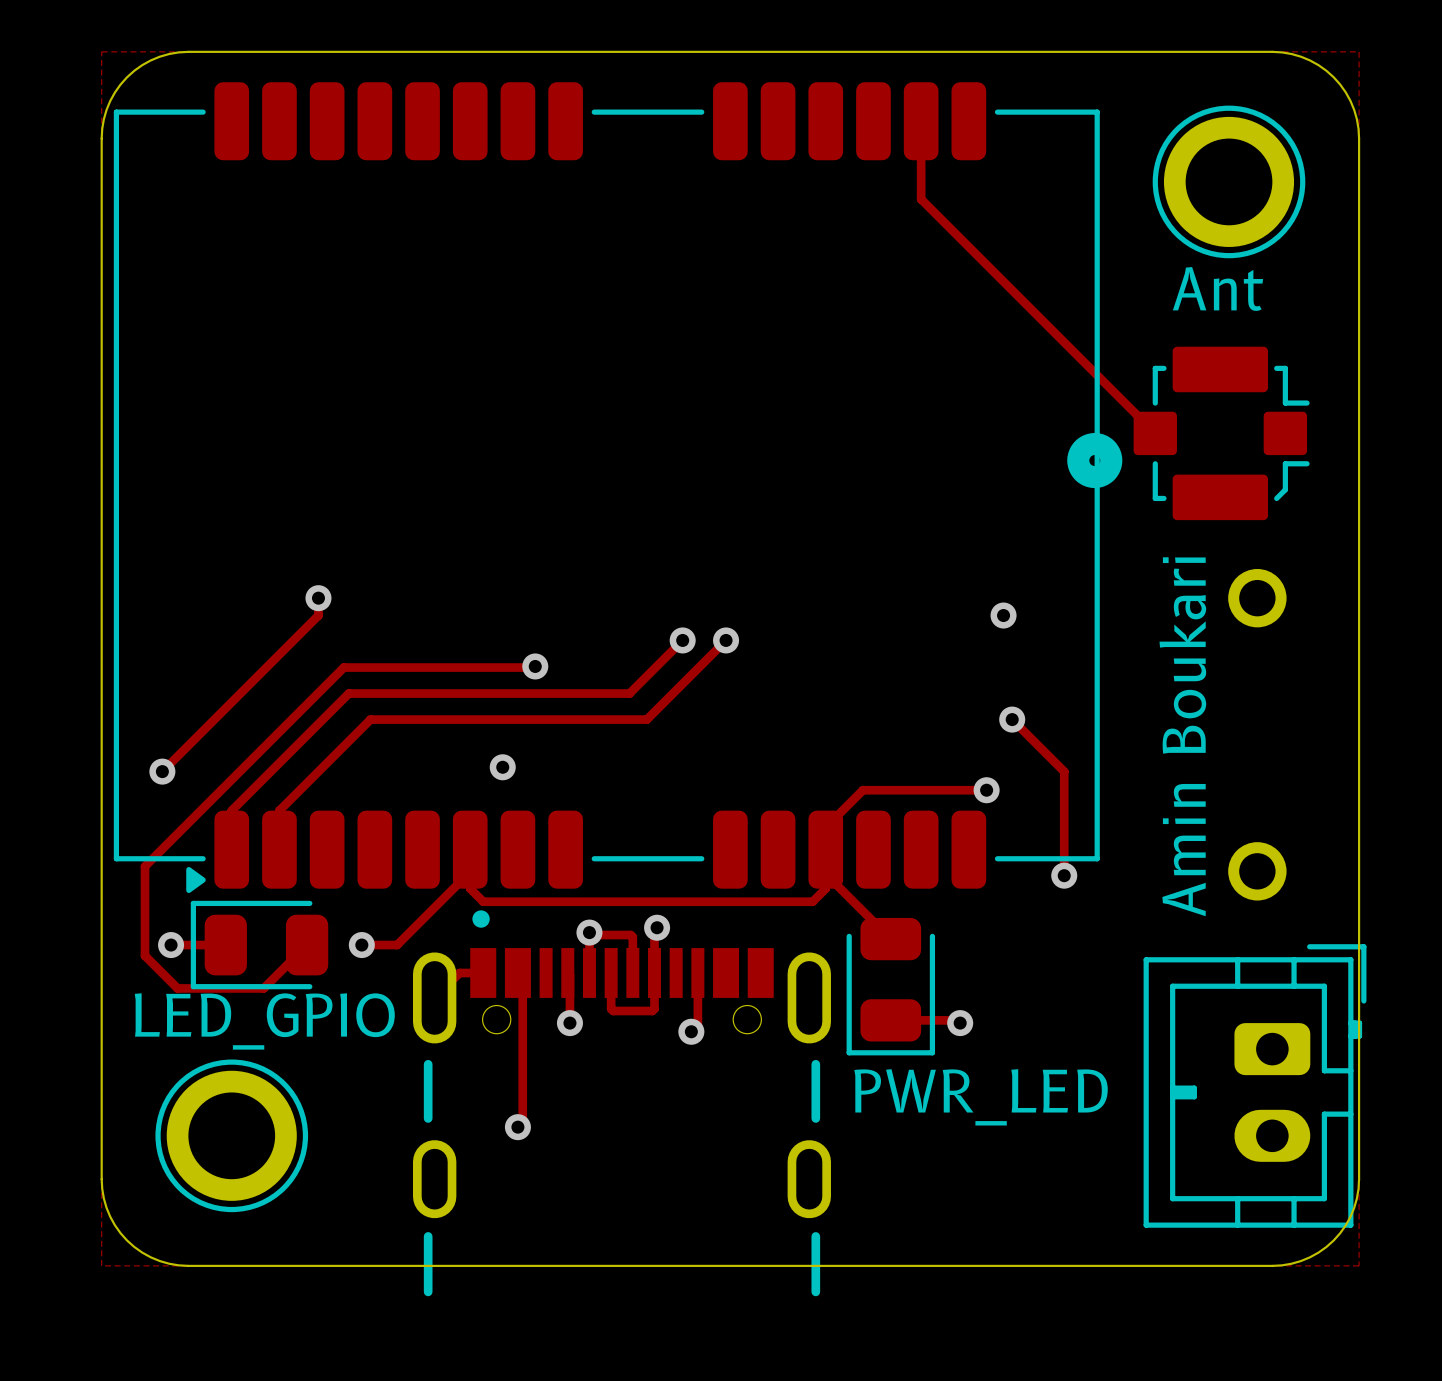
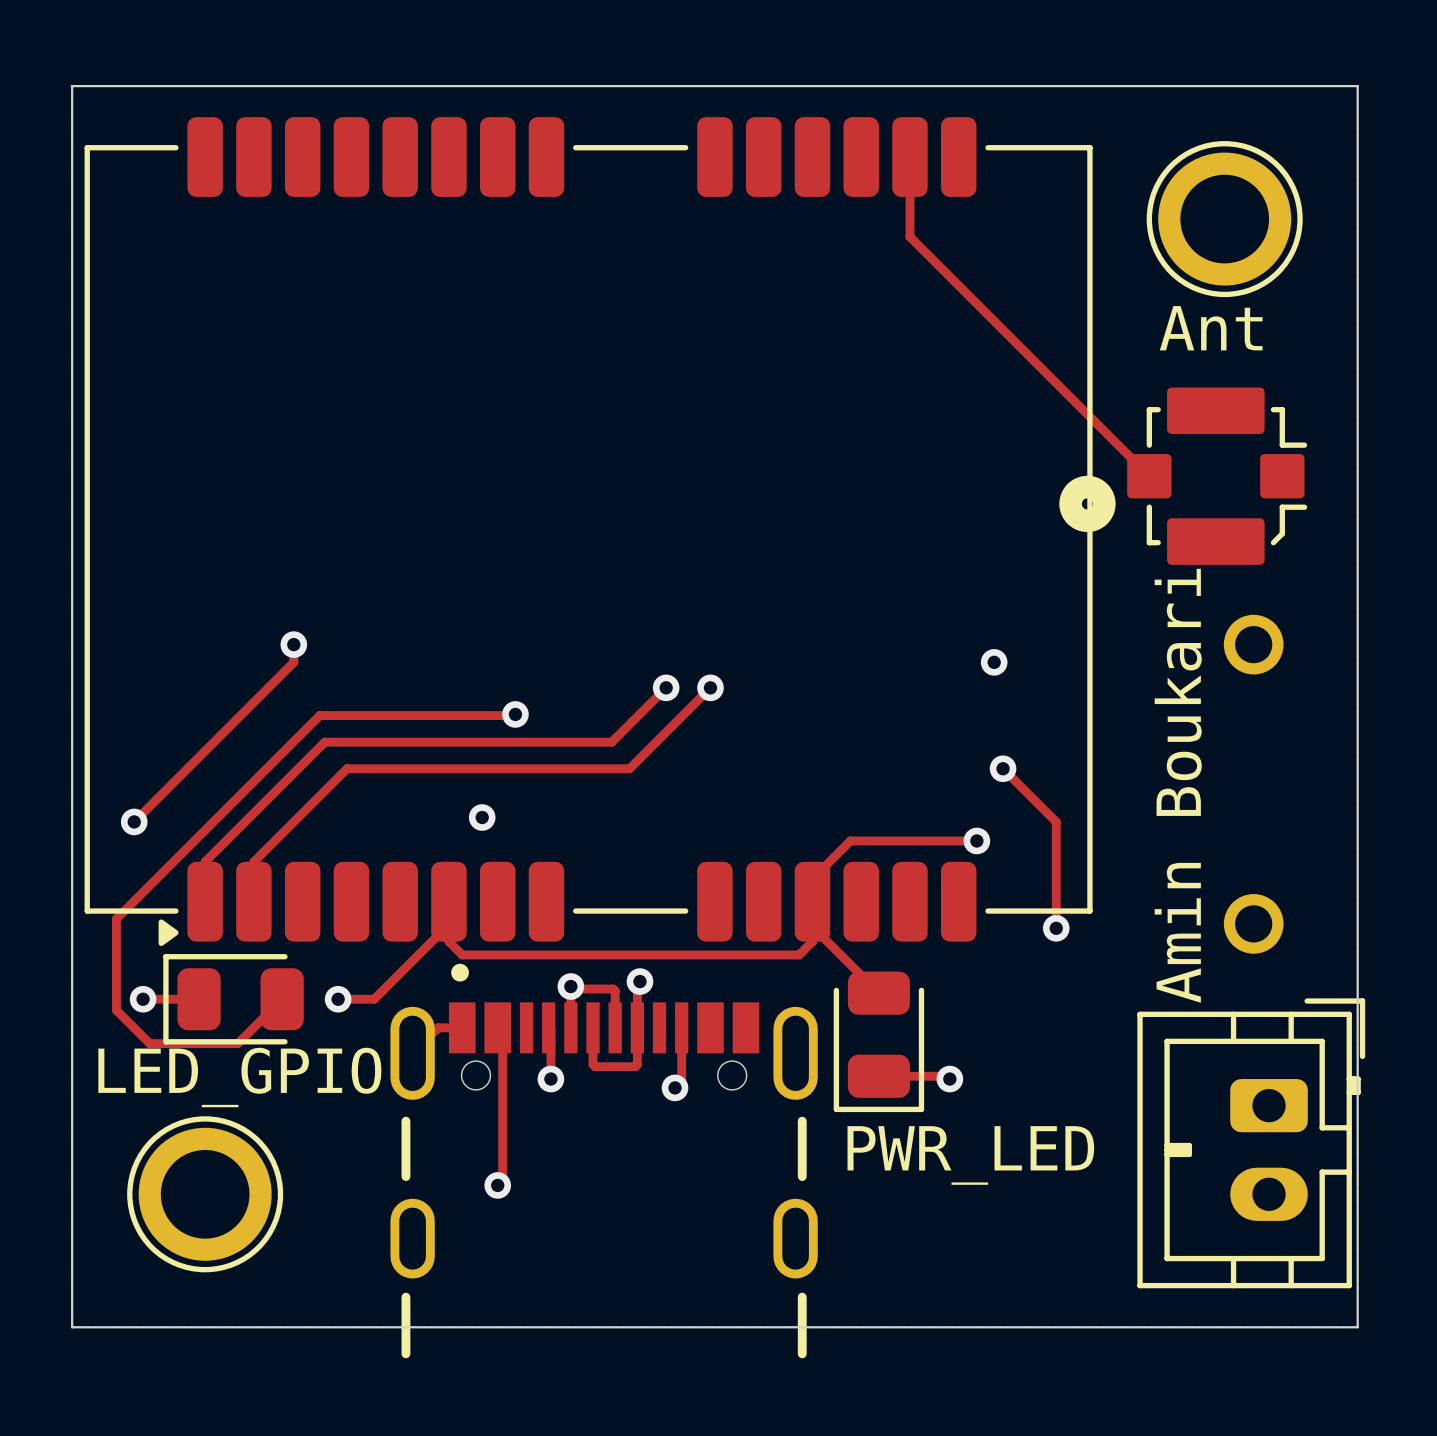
board edge: (188, 51) (159, 56) (142, 65) (127, 77) (114, 92) (106, 109) (101, 138) -> (160, 86) (72, 86) (72, 174)
board edge: (1272, 51) (1291, 54) (1309, 60) (1333, 77) (1350, 100) (1356, 119) (1359, 138) -> (1269, 86) (1357, 86) (1357, 174)
board edge: (101, 1179) (103, 1198) (110, 1216) (127, 1240) (142, 1252) (159, 1261) (188, 1265) -> (72, 1238) (72, 1327) (160, 1327)
board edge: (1359, 1179) (1354, 1207) (1345, 1225) (1333, 1240) (1309, 1257) (1291, 1263) (1272, 1265) -> (1357, 1238) (1357, 1327) (1269, 1327)

